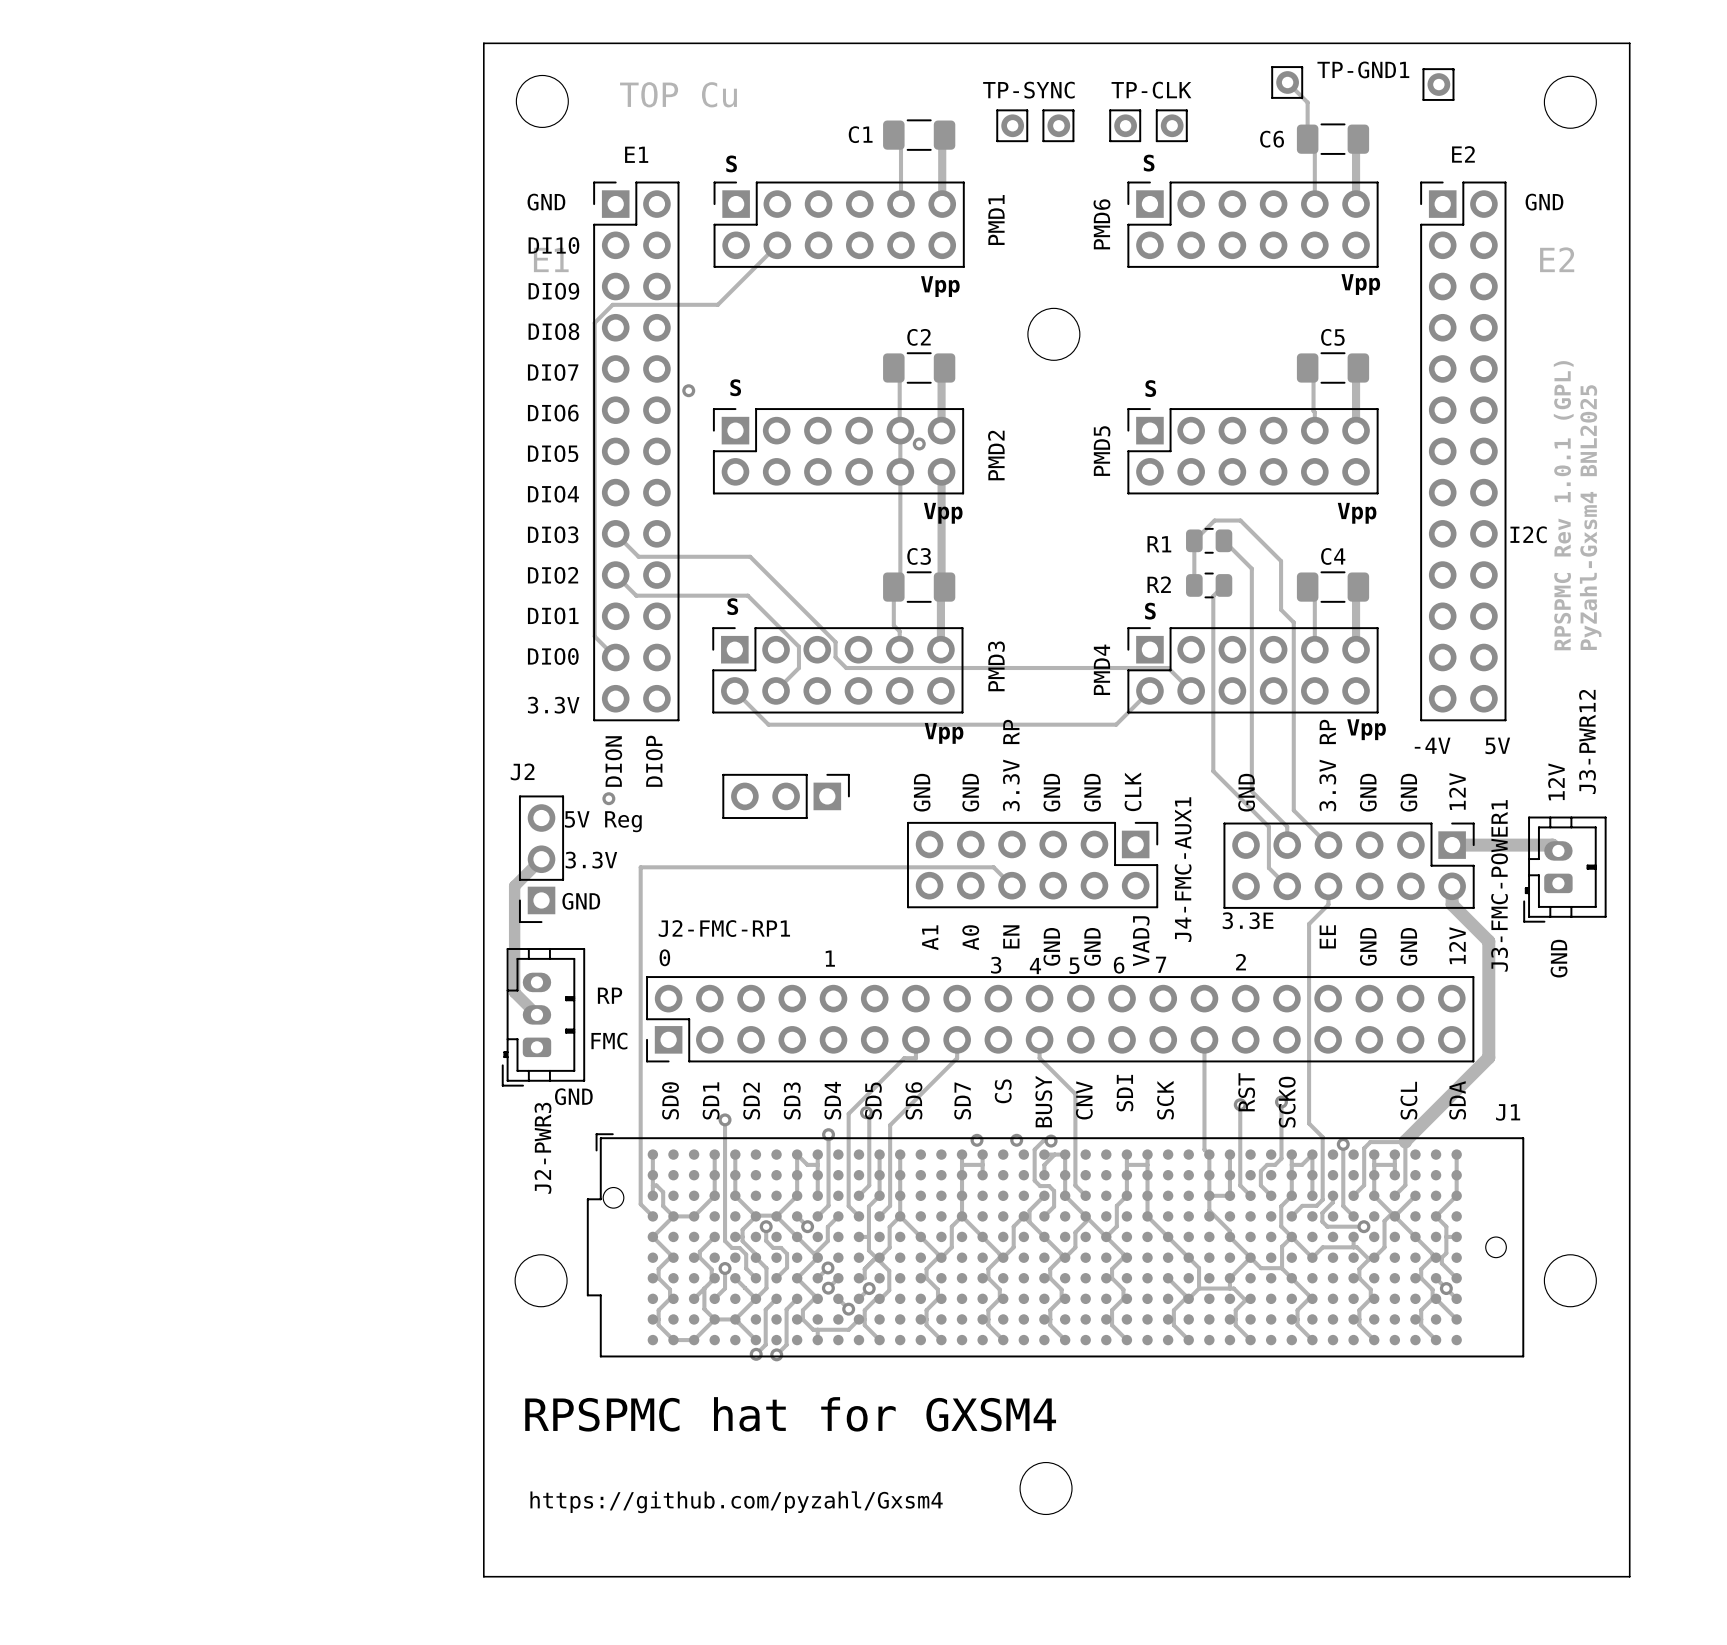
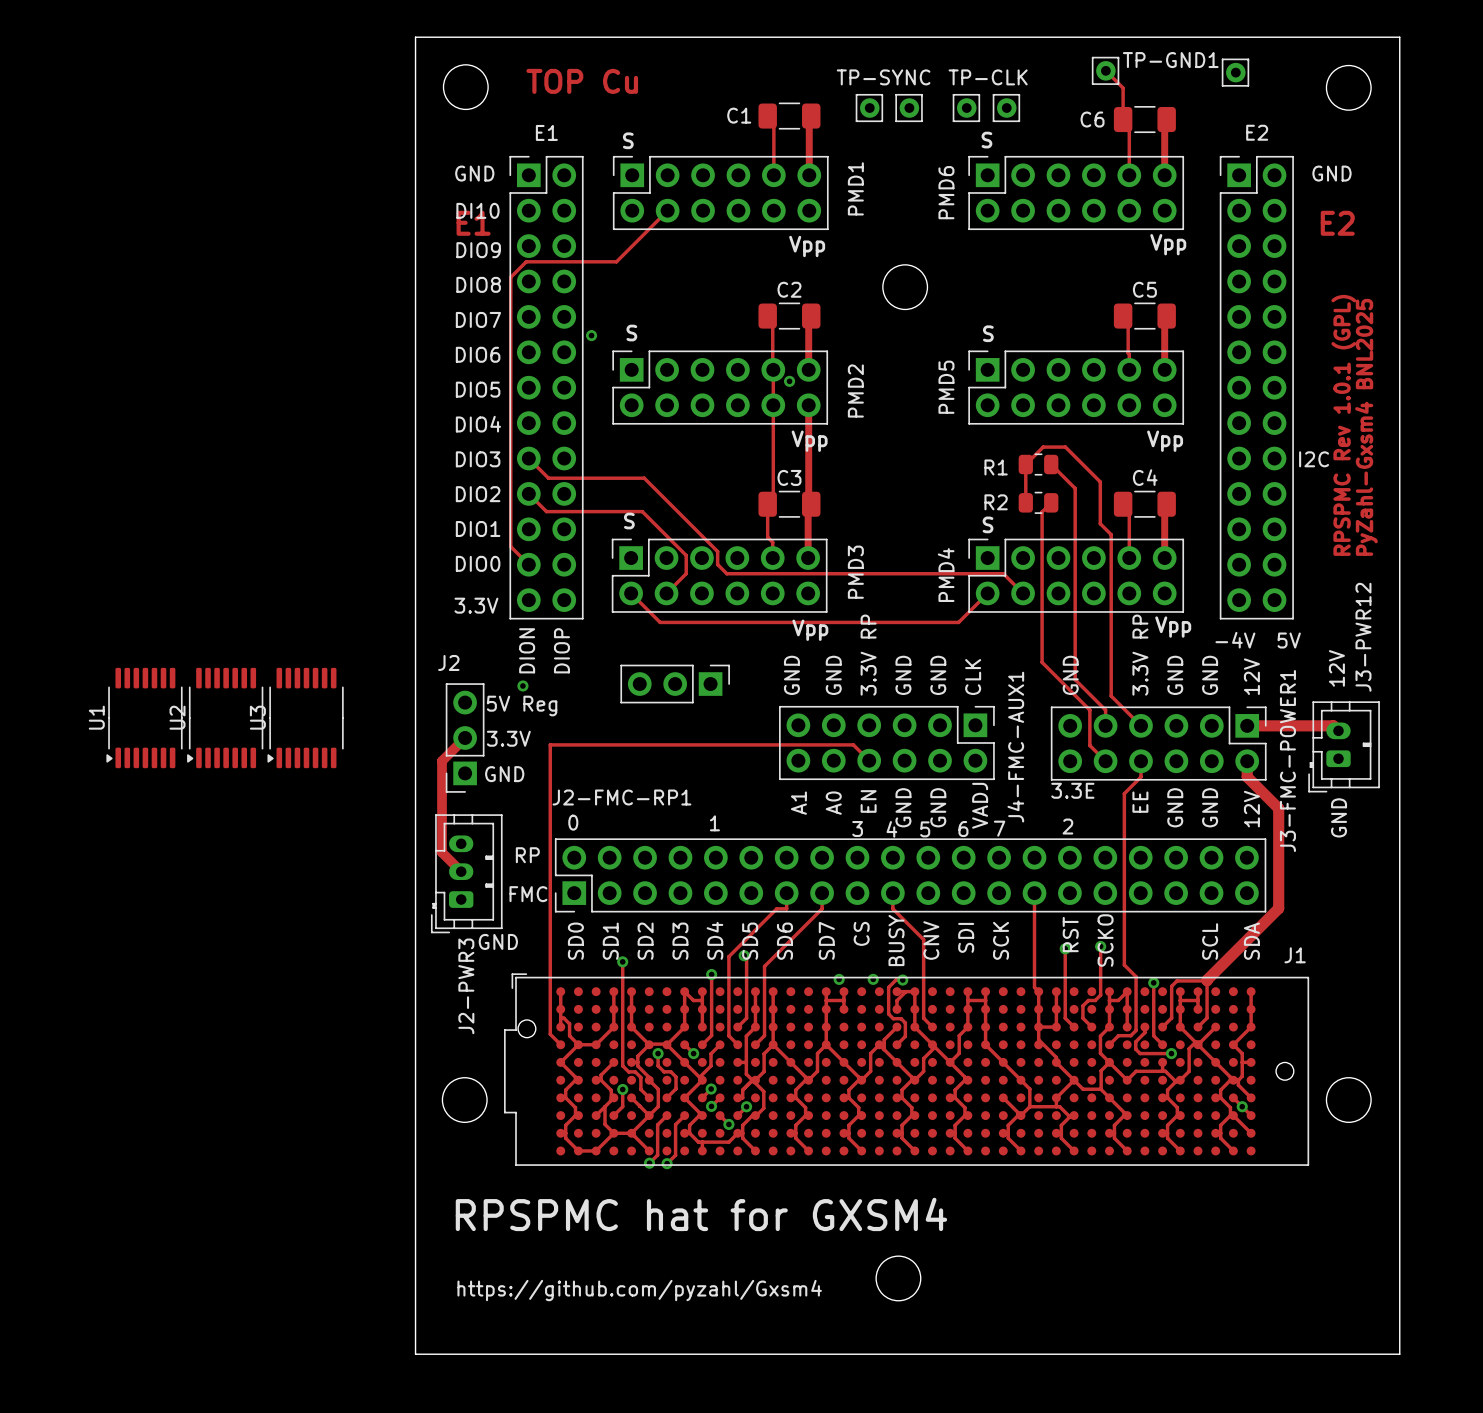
U1: none -> (144, 718)
U2: none -> (225, 718)
U3: none -> (305, 718)

